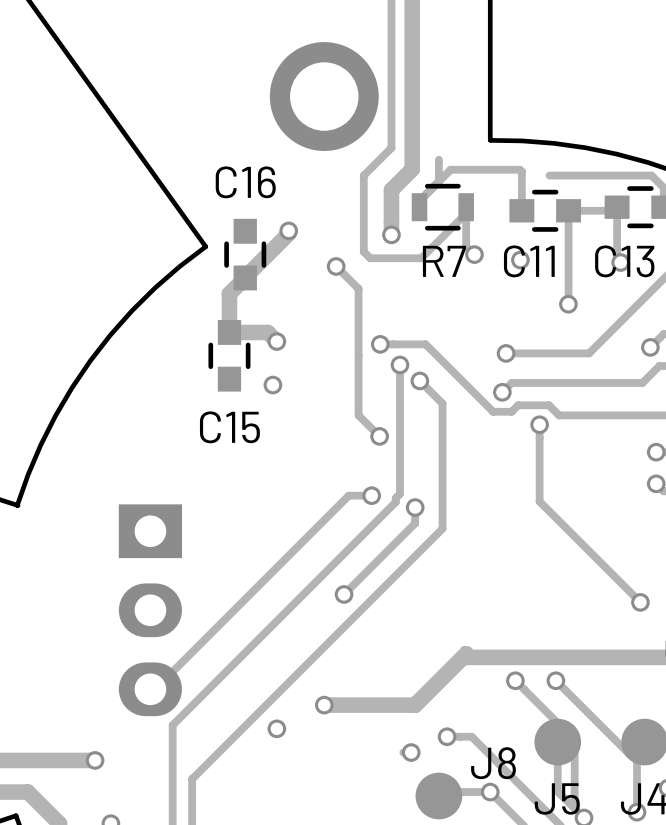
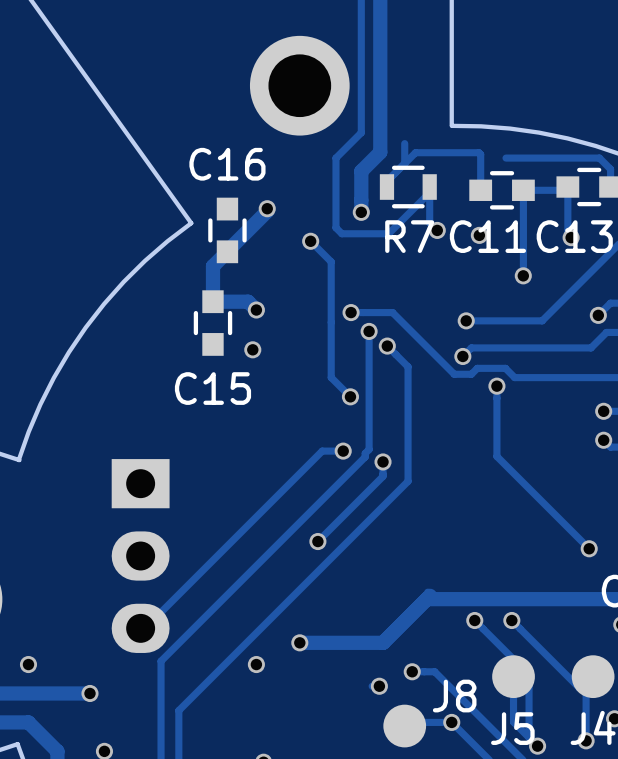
via: none -> (28, 664)

